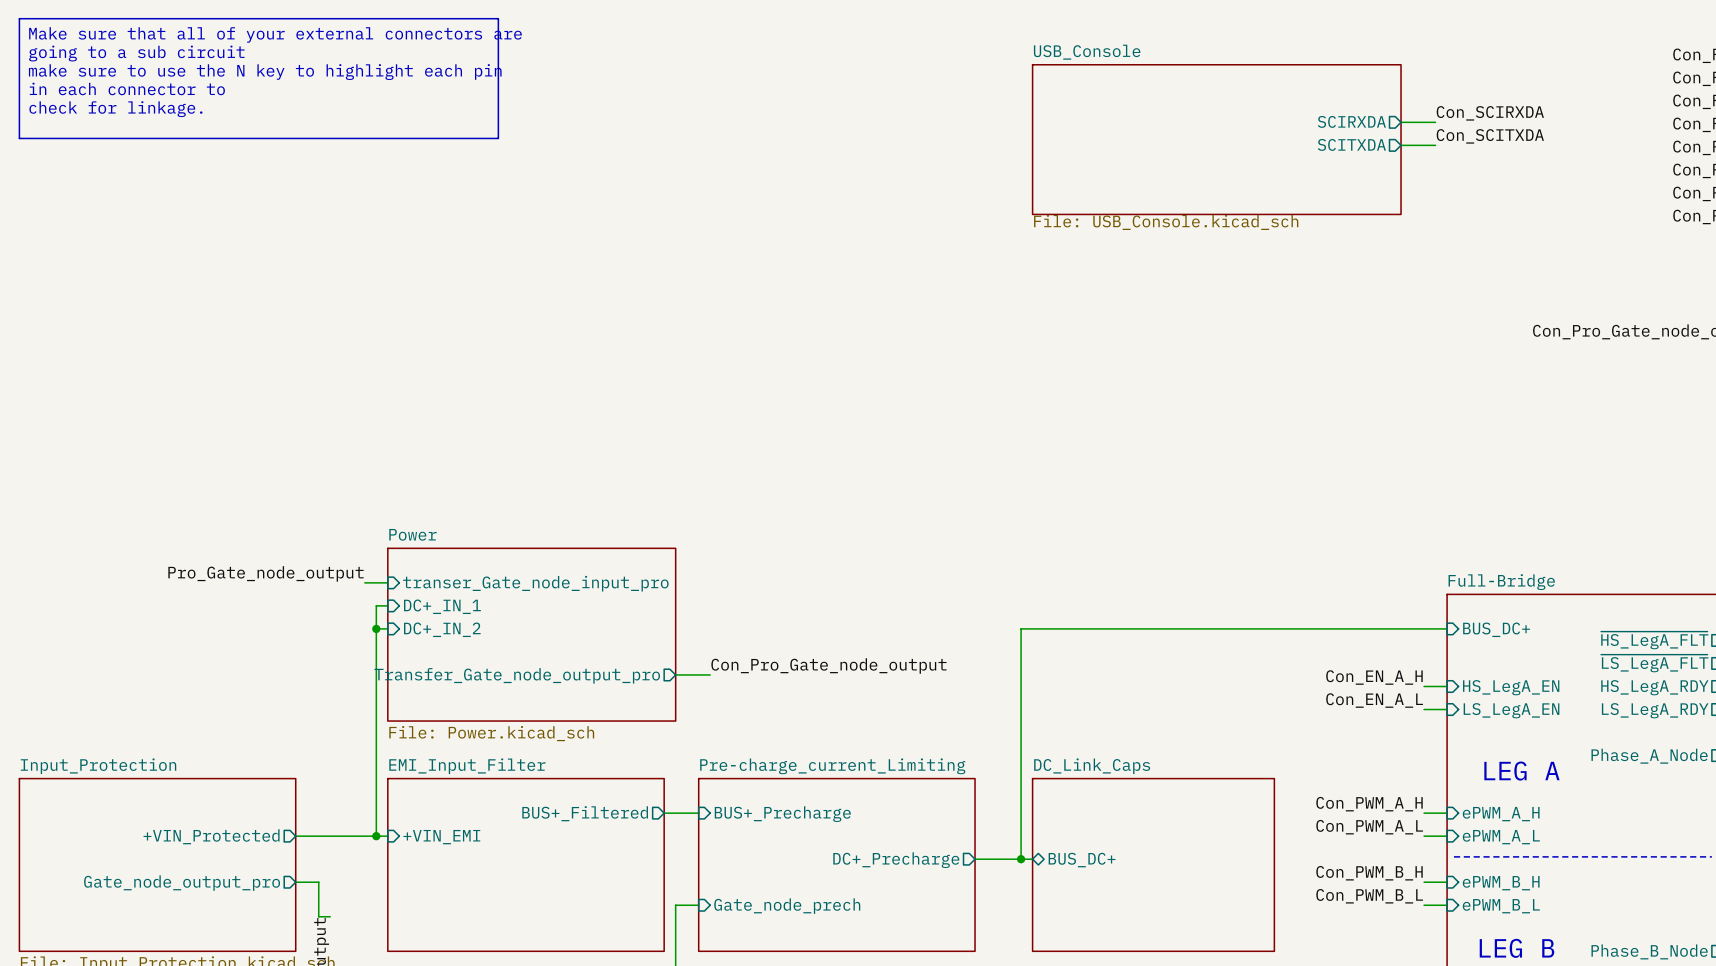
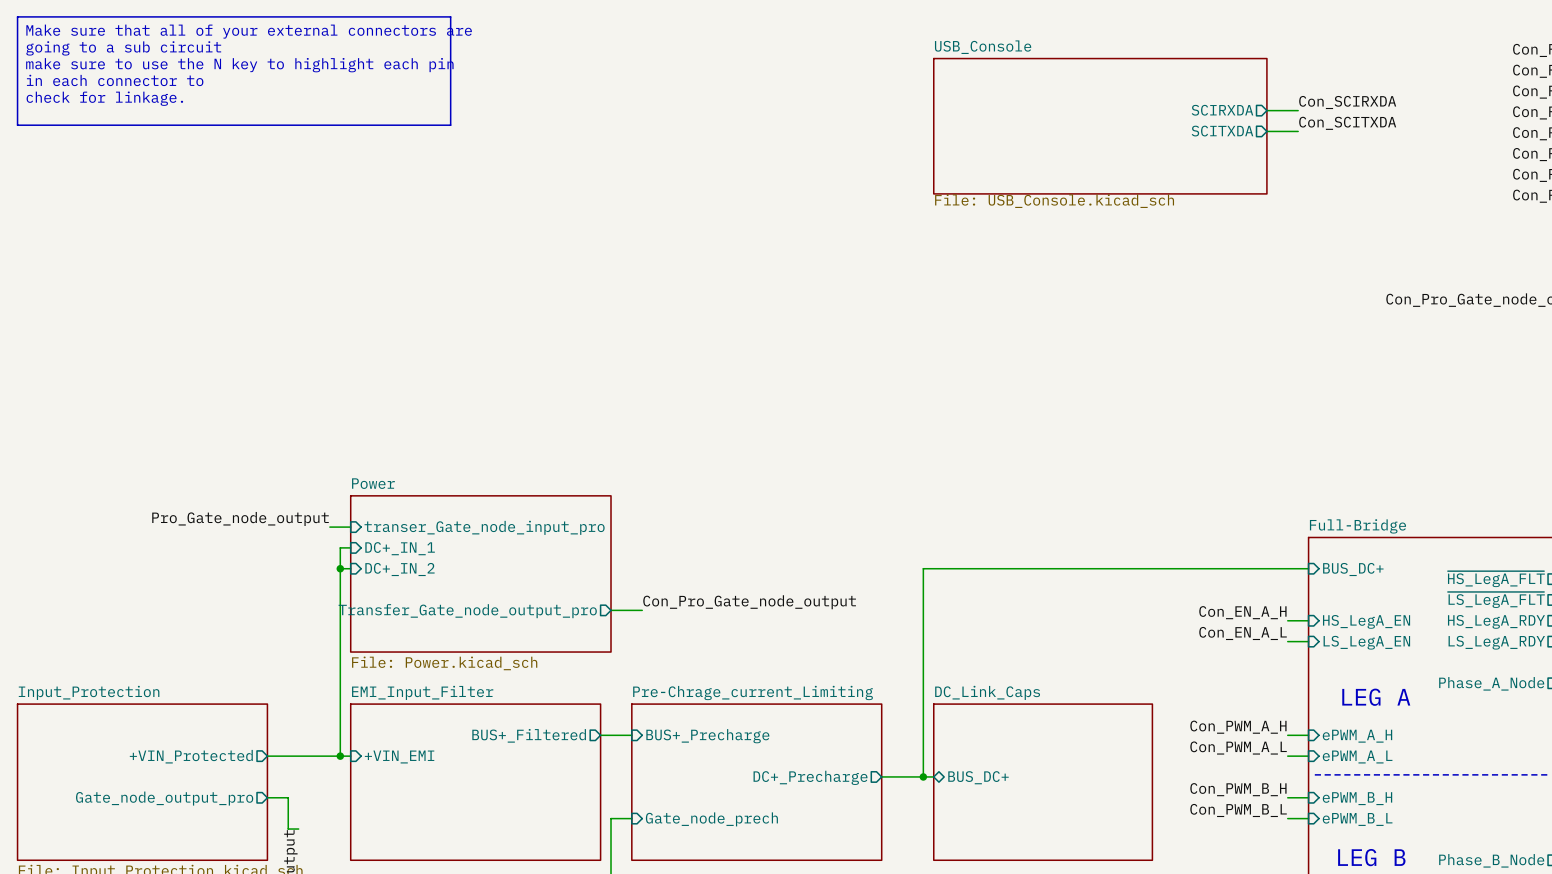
sheet Pre-charge_current_Limiting name: Pre-charge_current_Limiting (832, 766) -> Pre-Chrage_current_Limiting (753, 692)

